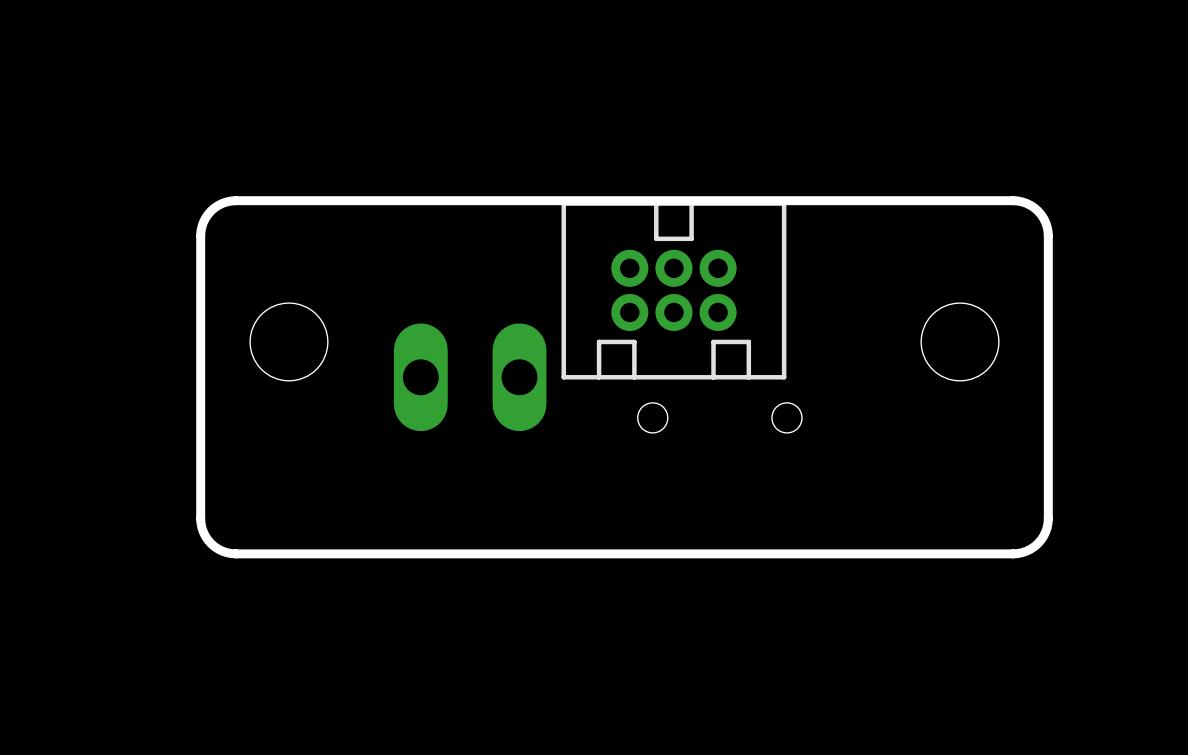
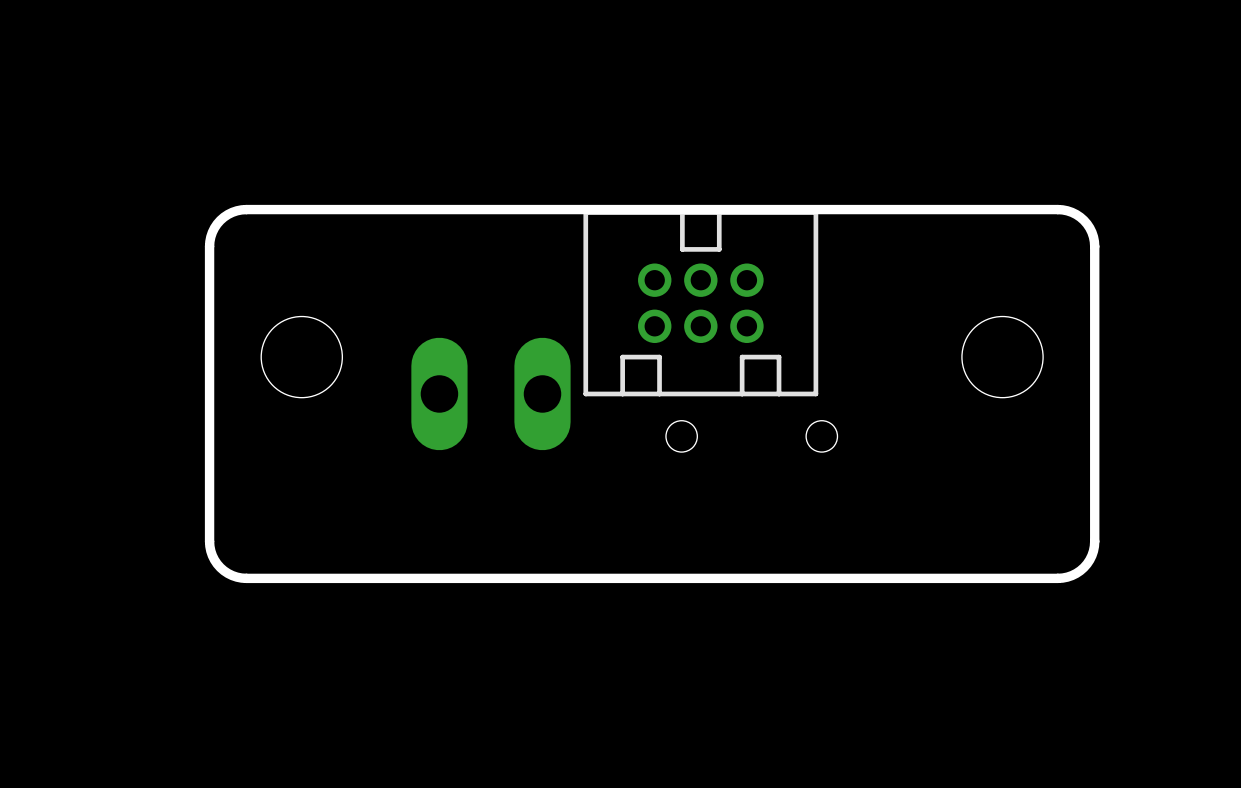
part footprint: [561, 201, 787, 380] -> [583, 210, 819, 397]

